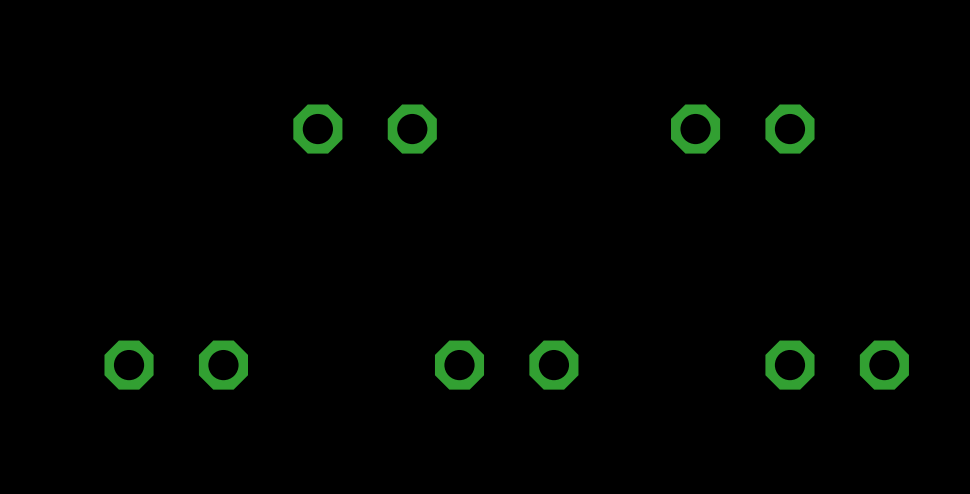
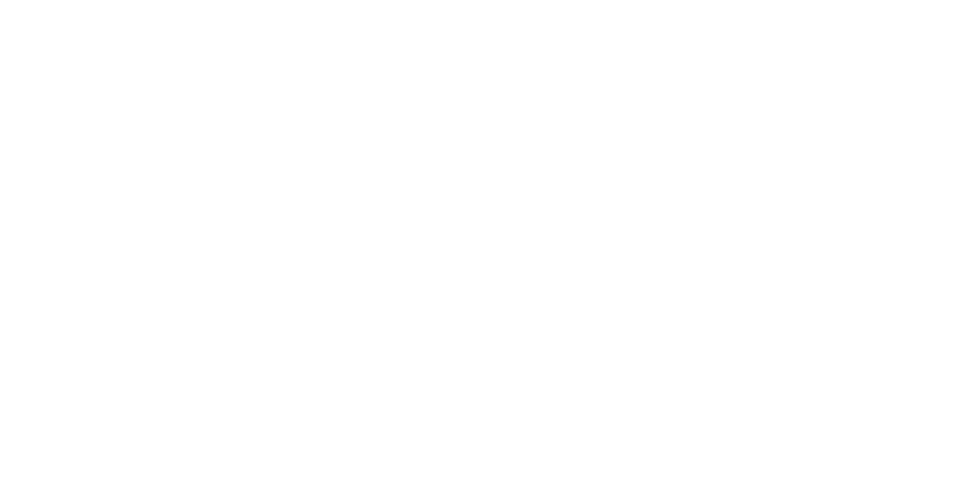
part: (365, 129) -> none
part: (742, 129) -> none
part: (176, 365) -> none
part: (506, 365) -> none
part: (837, 365) -> none

